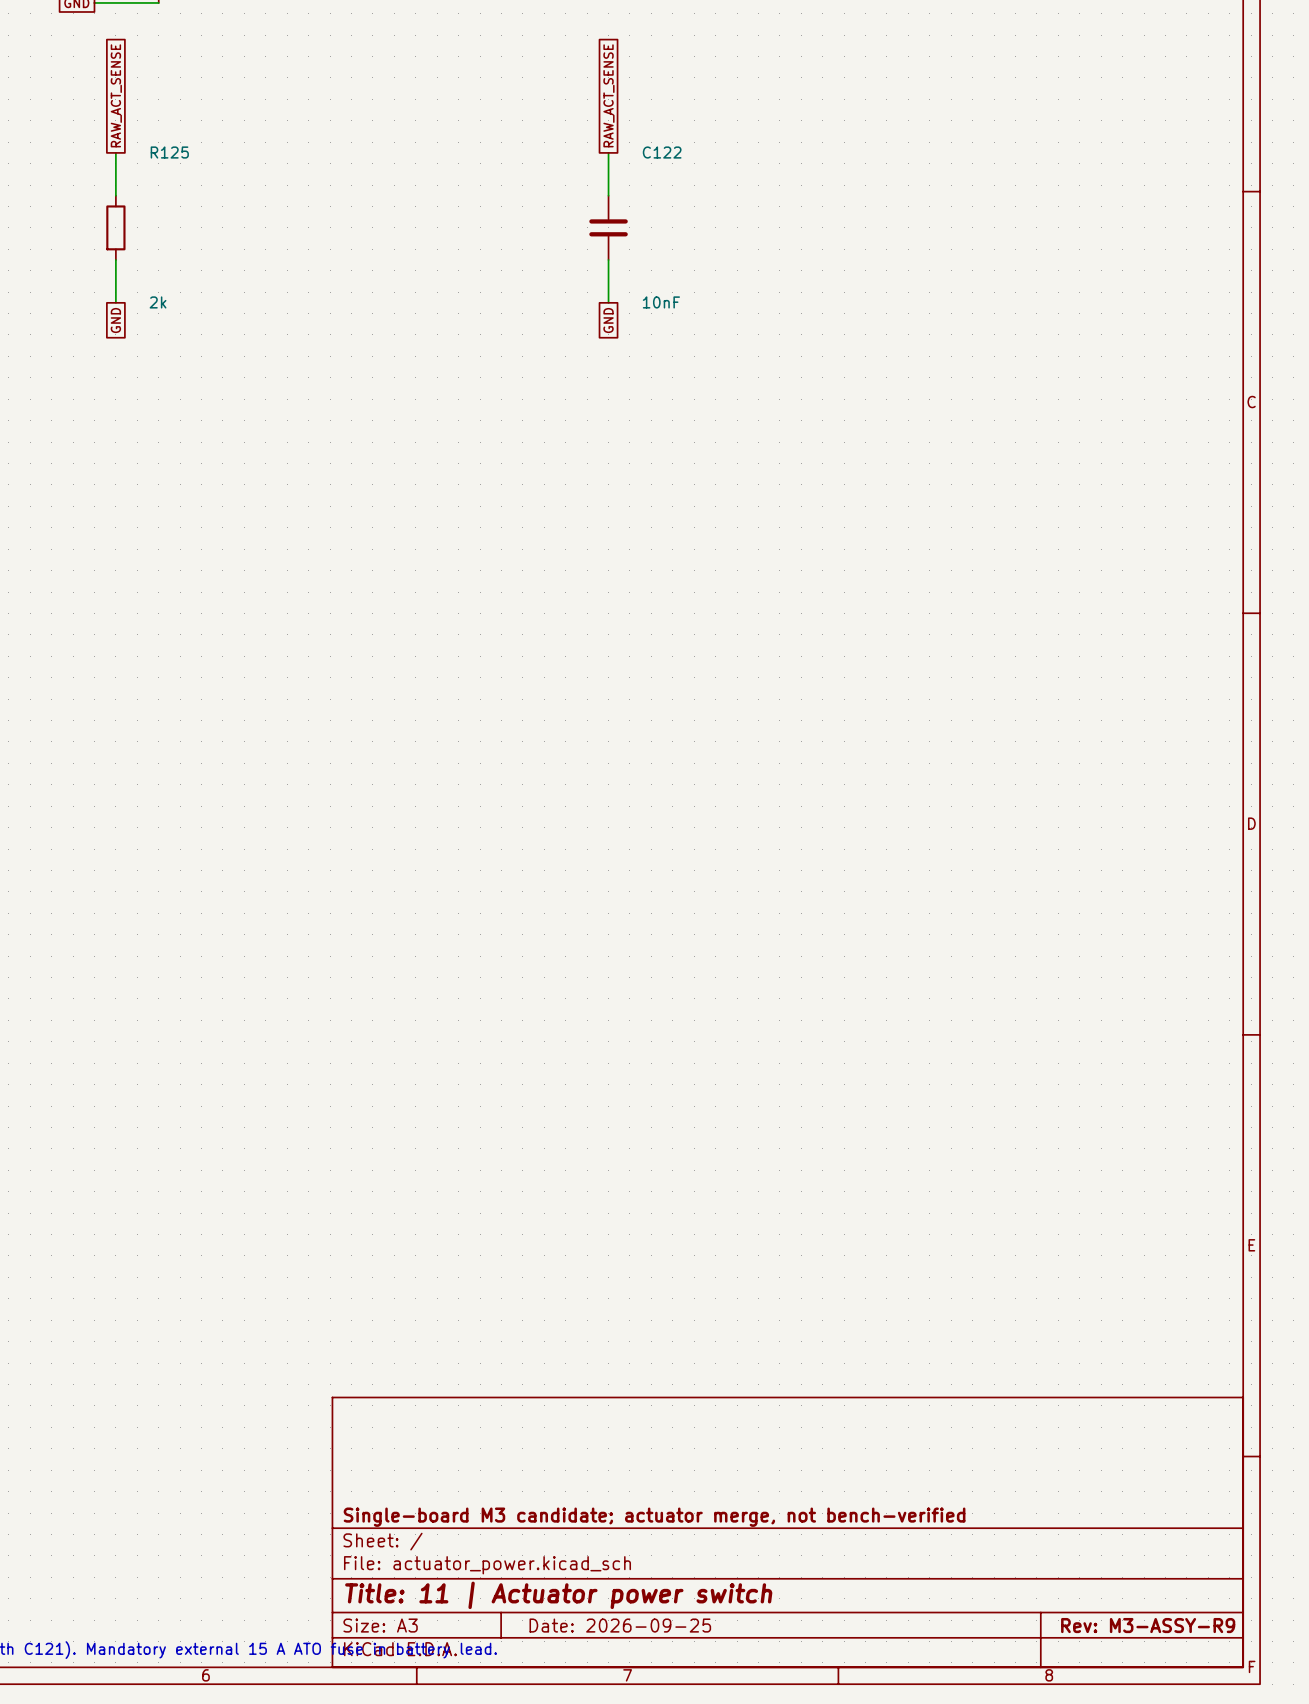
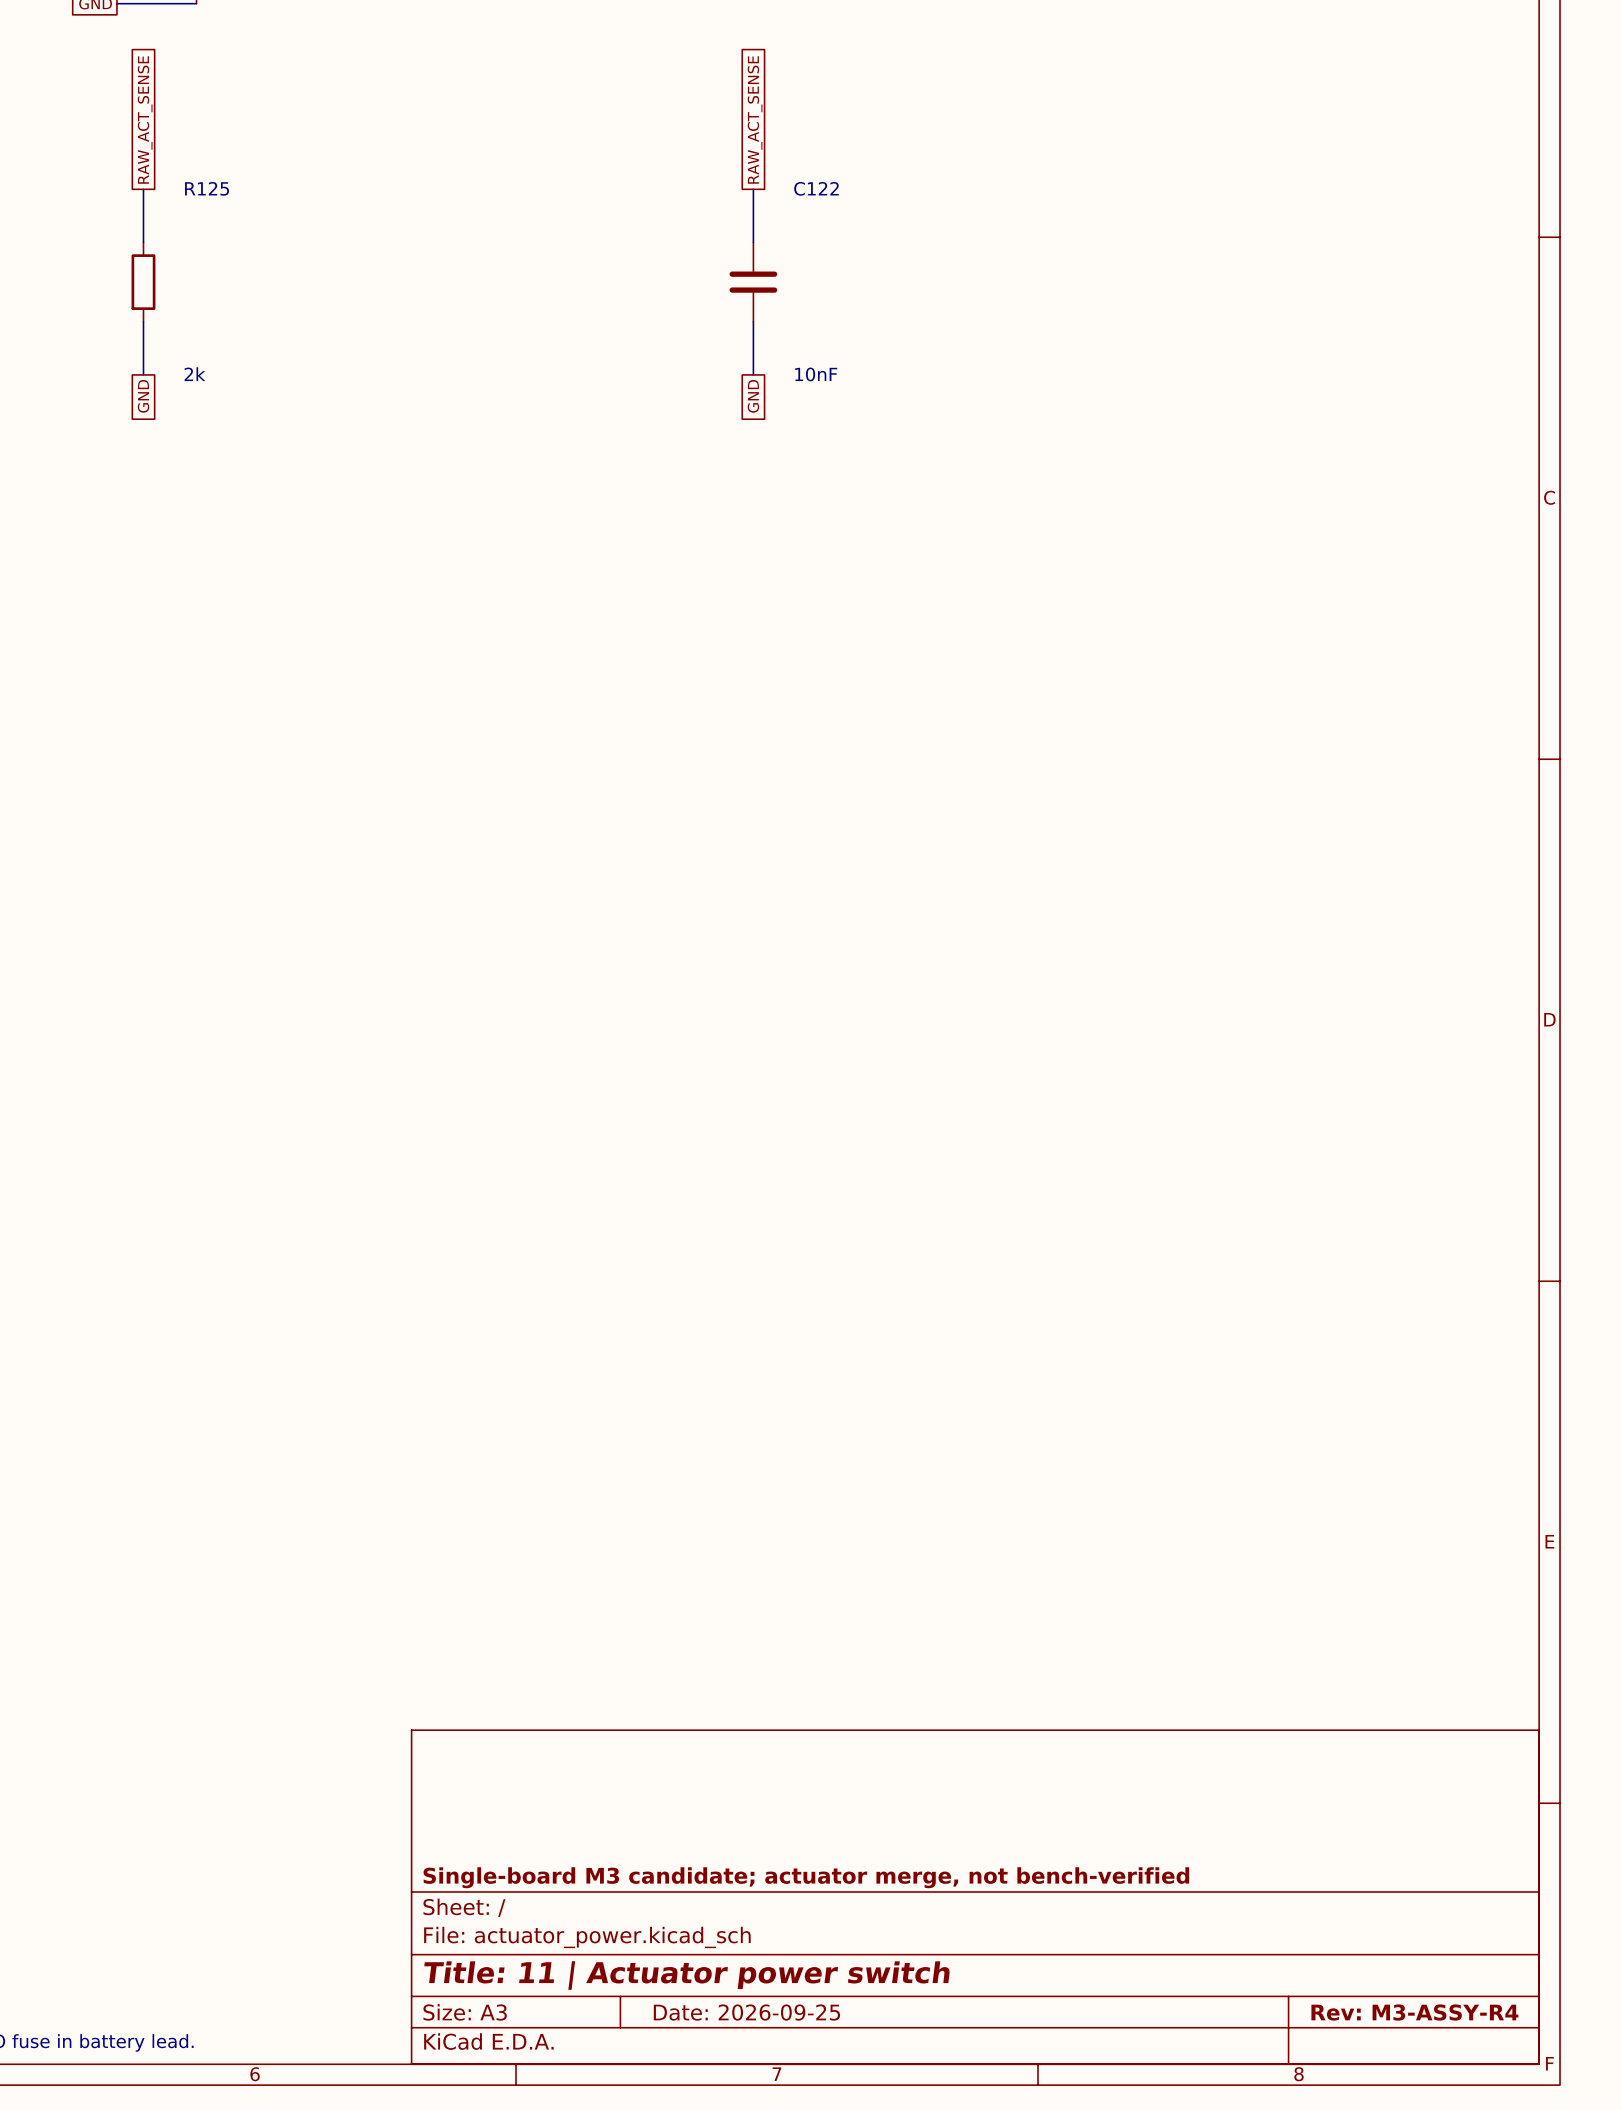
title block: Rev: M3-ASSY-R9 (1148, 1625) -> Rev: M3-ASSY-R4 (1414, 2012)

